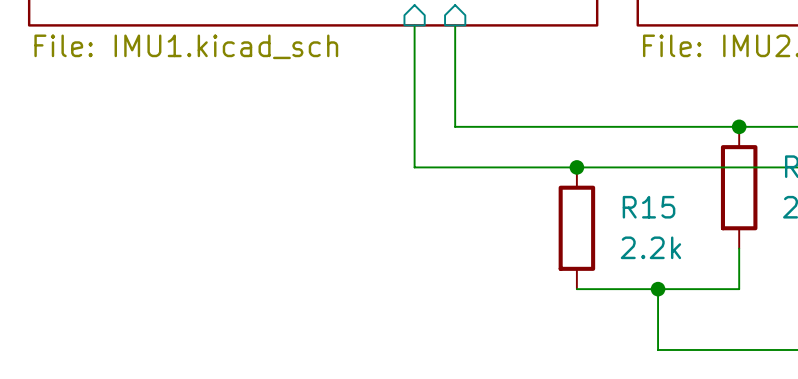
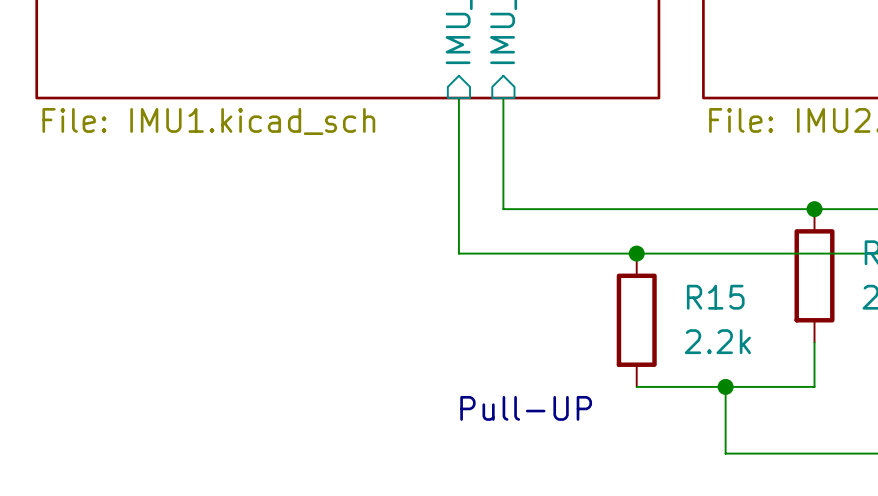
text: none -> Pull-UP (526, 408)

